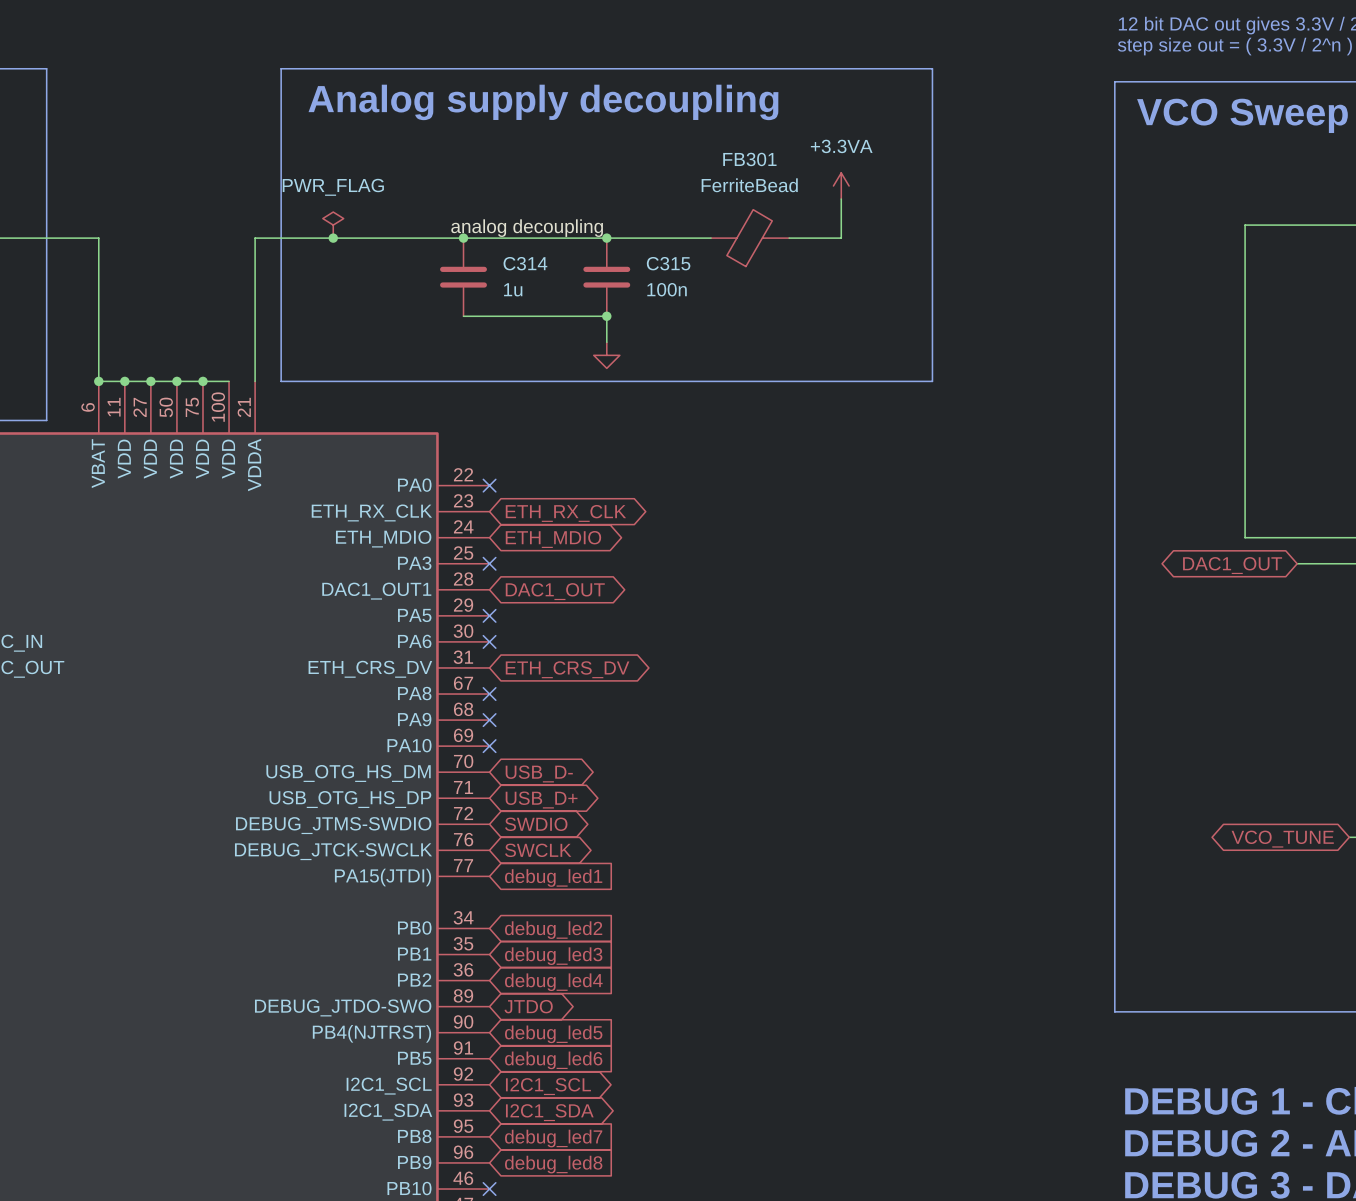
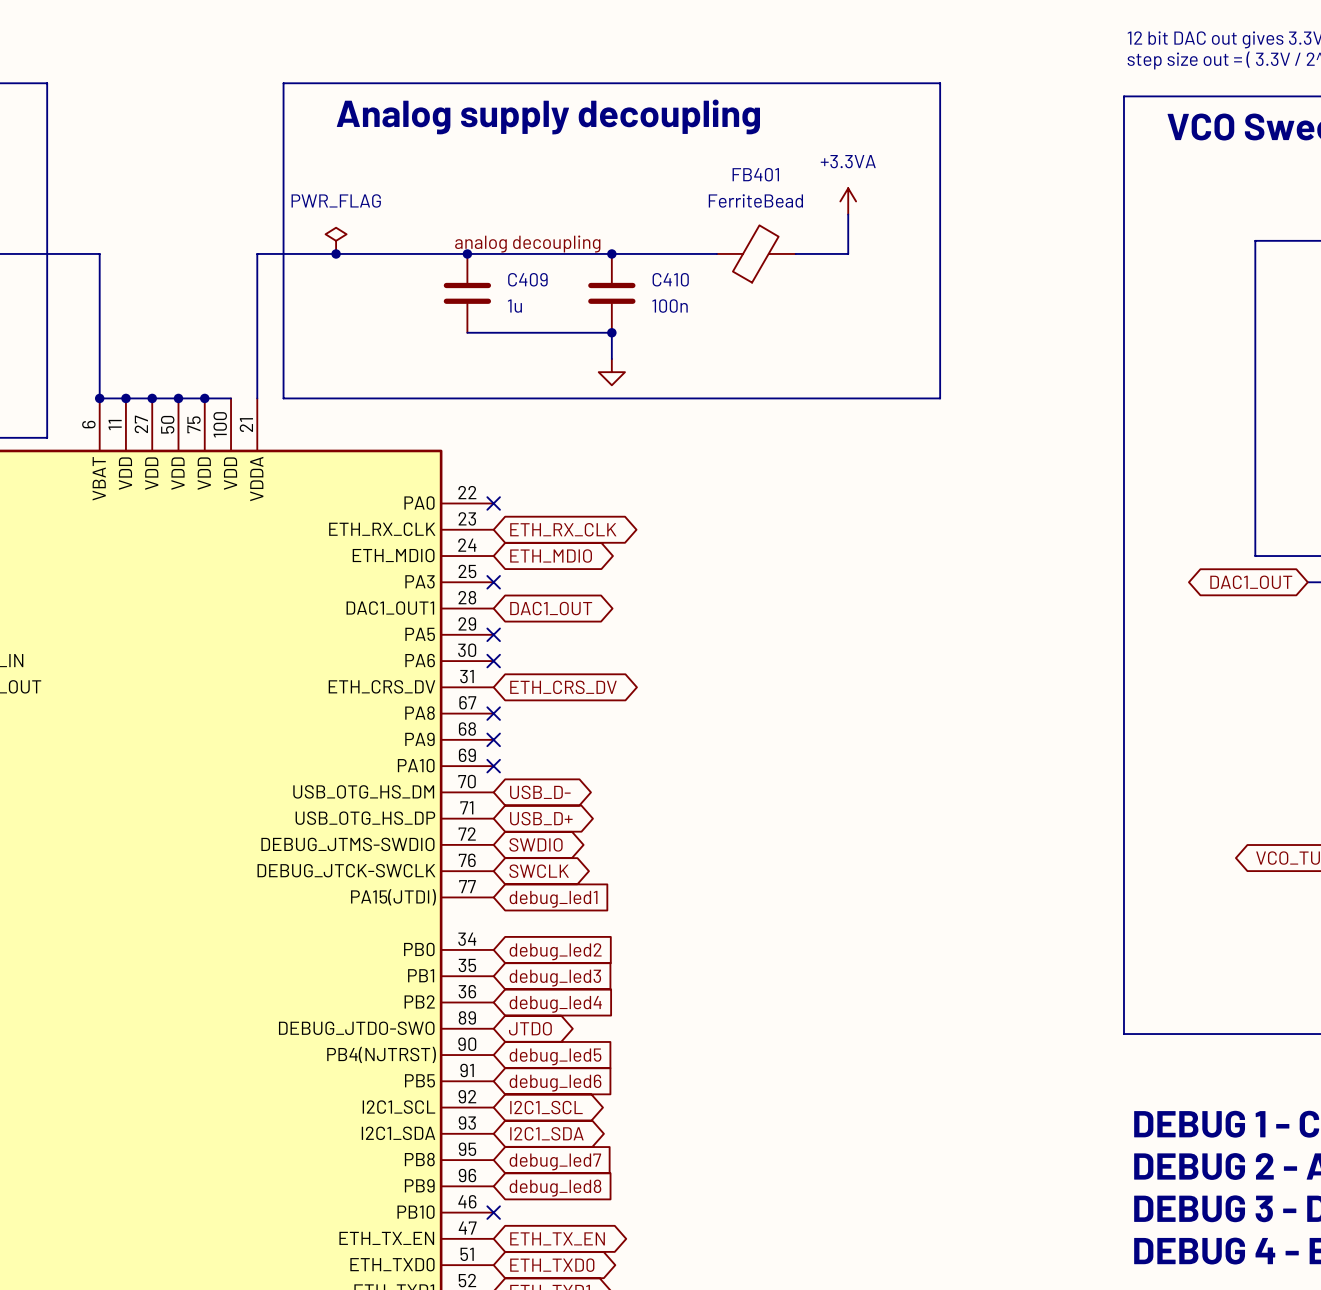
FB301 name: FB301 (749, 159) -> FB401 (755, 174)
C314 name: C314 (525, 263) -> C409 (527, 279)
C315 name: C315 (668, 263) -> C410 (670, 279)

